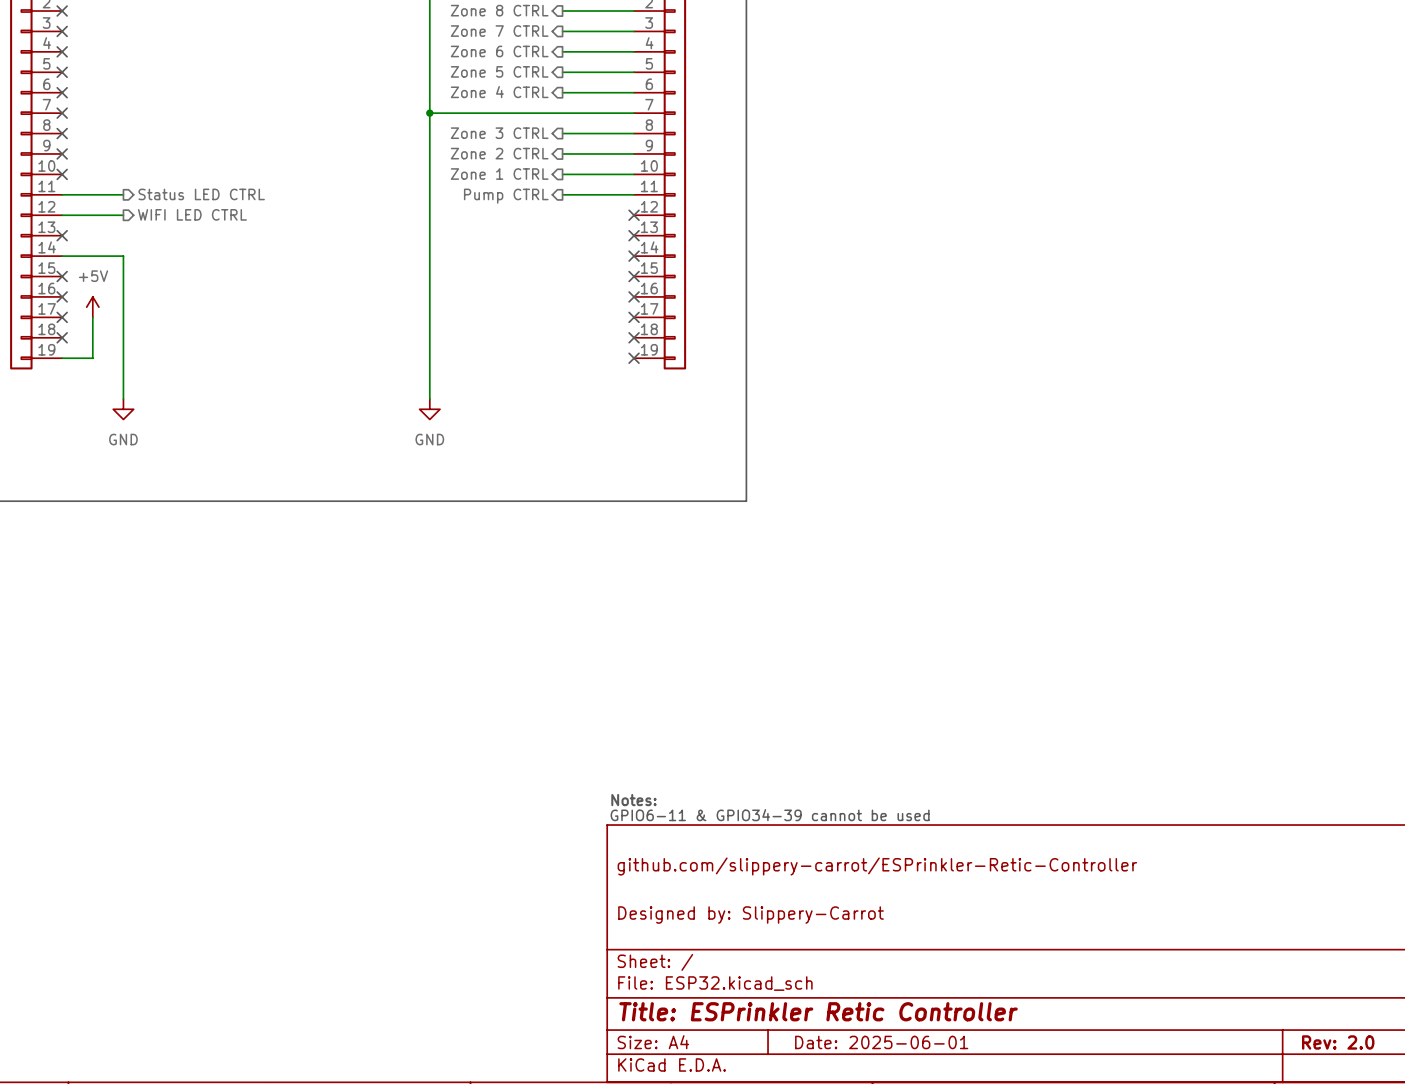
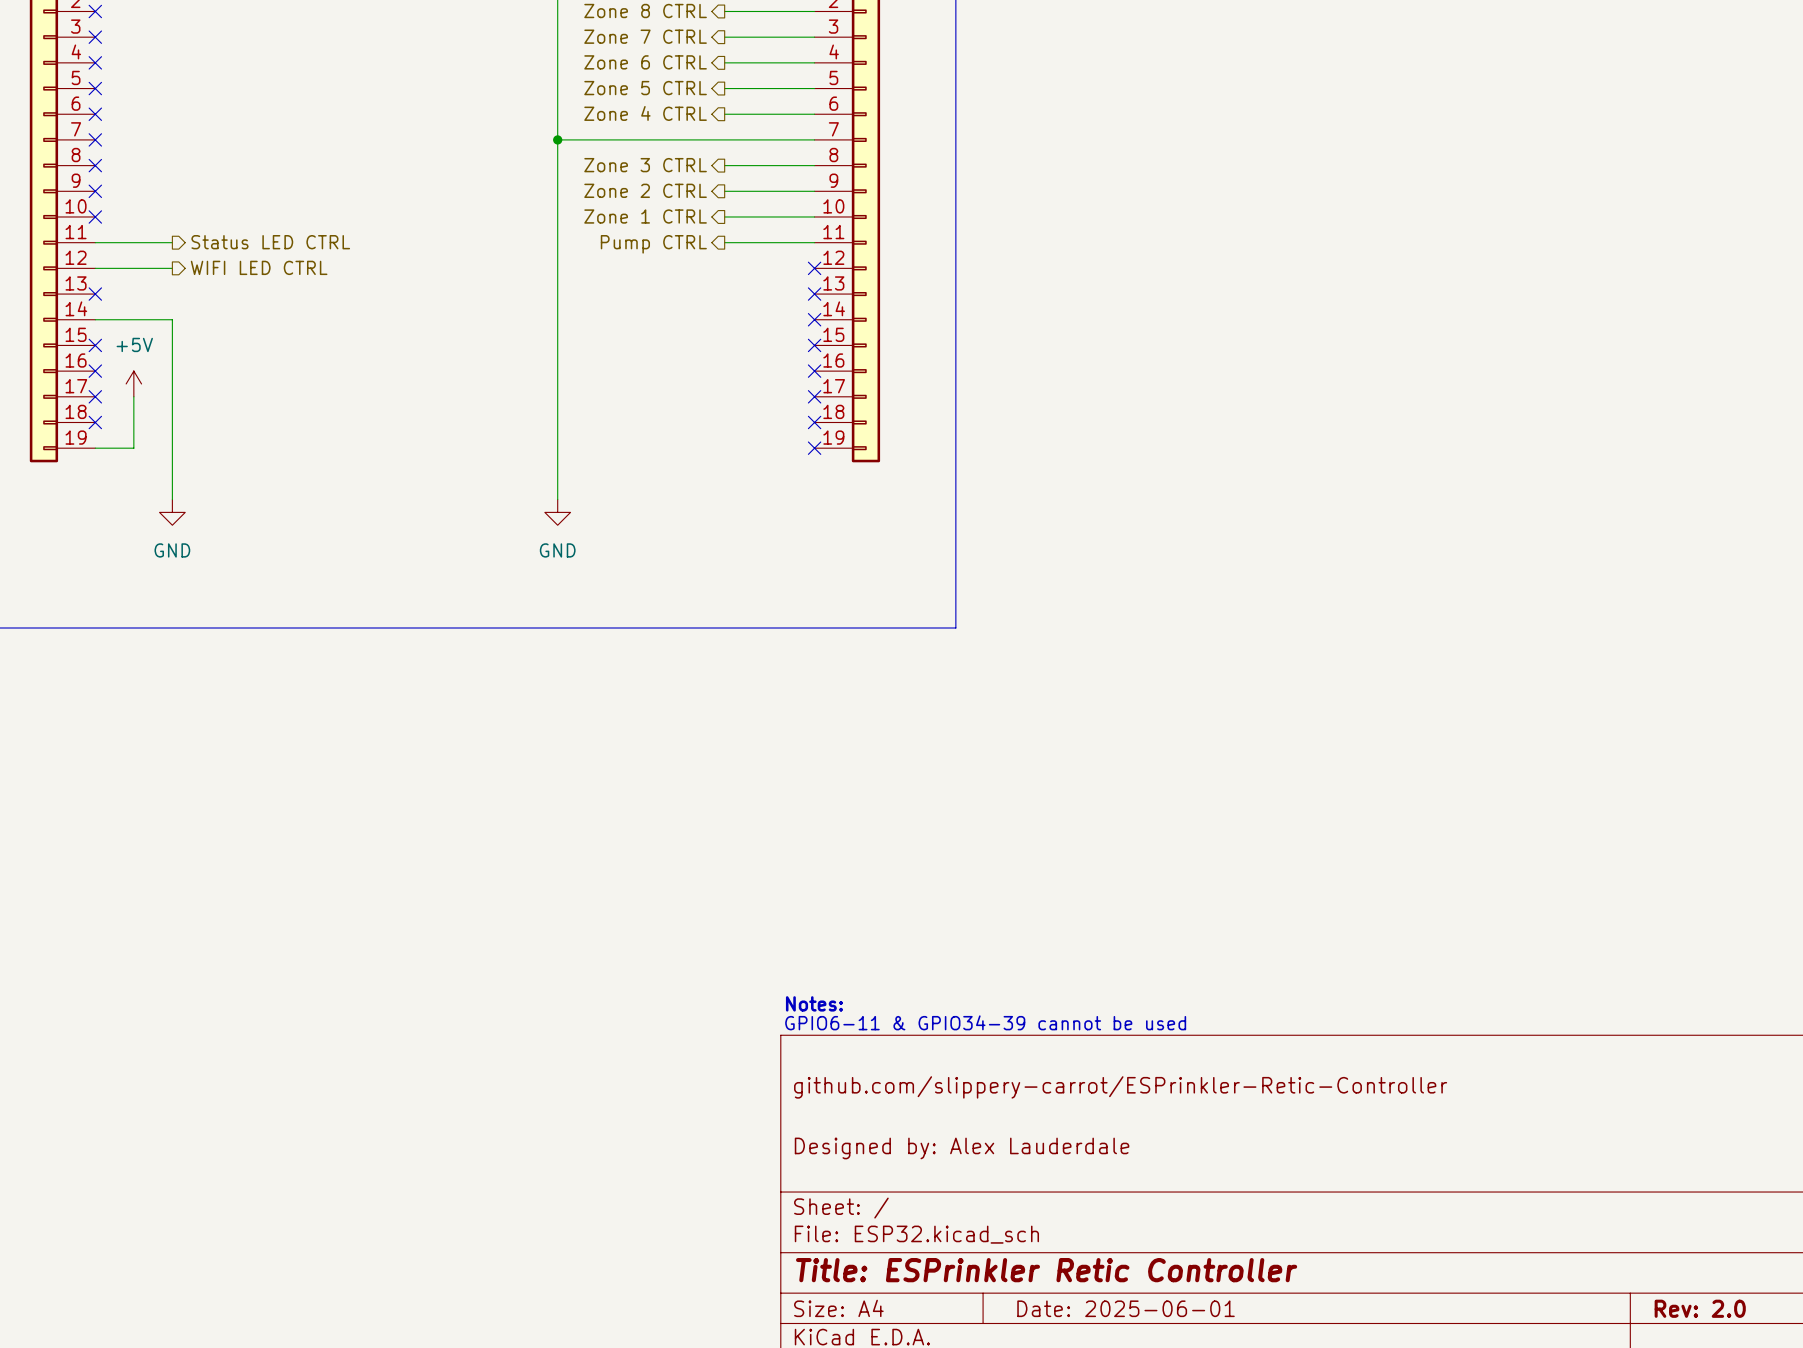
title block: Designed by: Slippery-Carrot (751, 915) -> Designed by: Alex Lauderdale (962, 1148)

